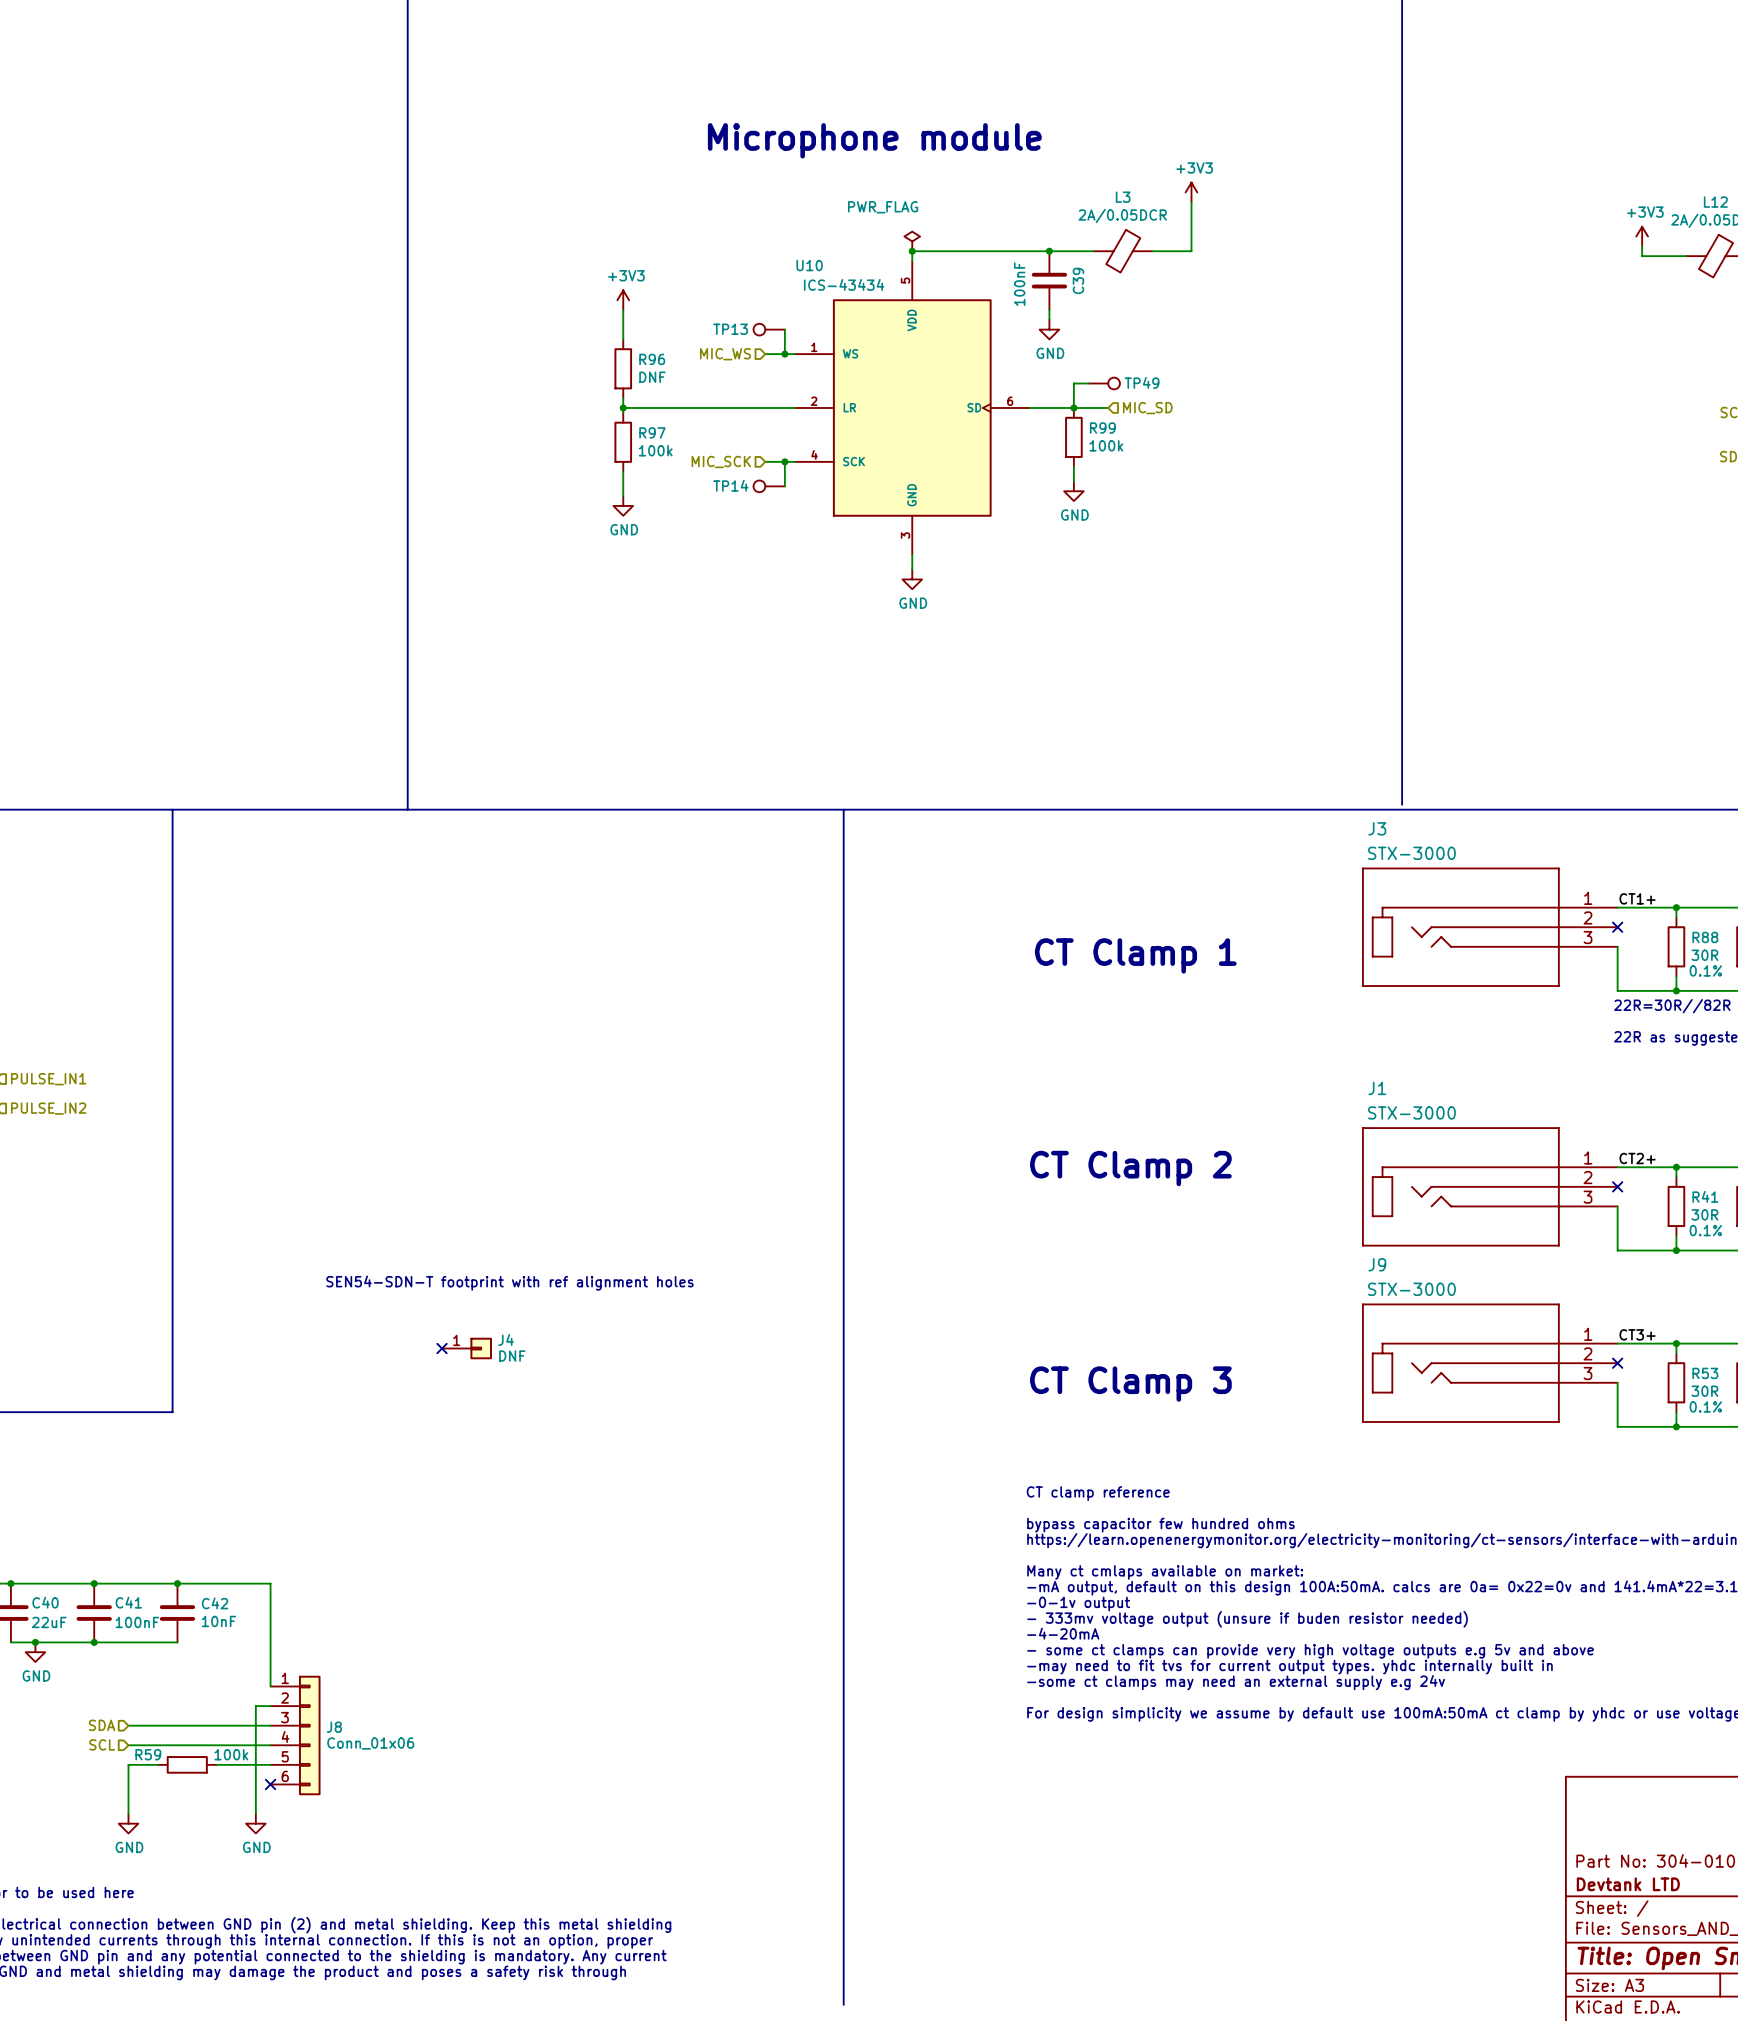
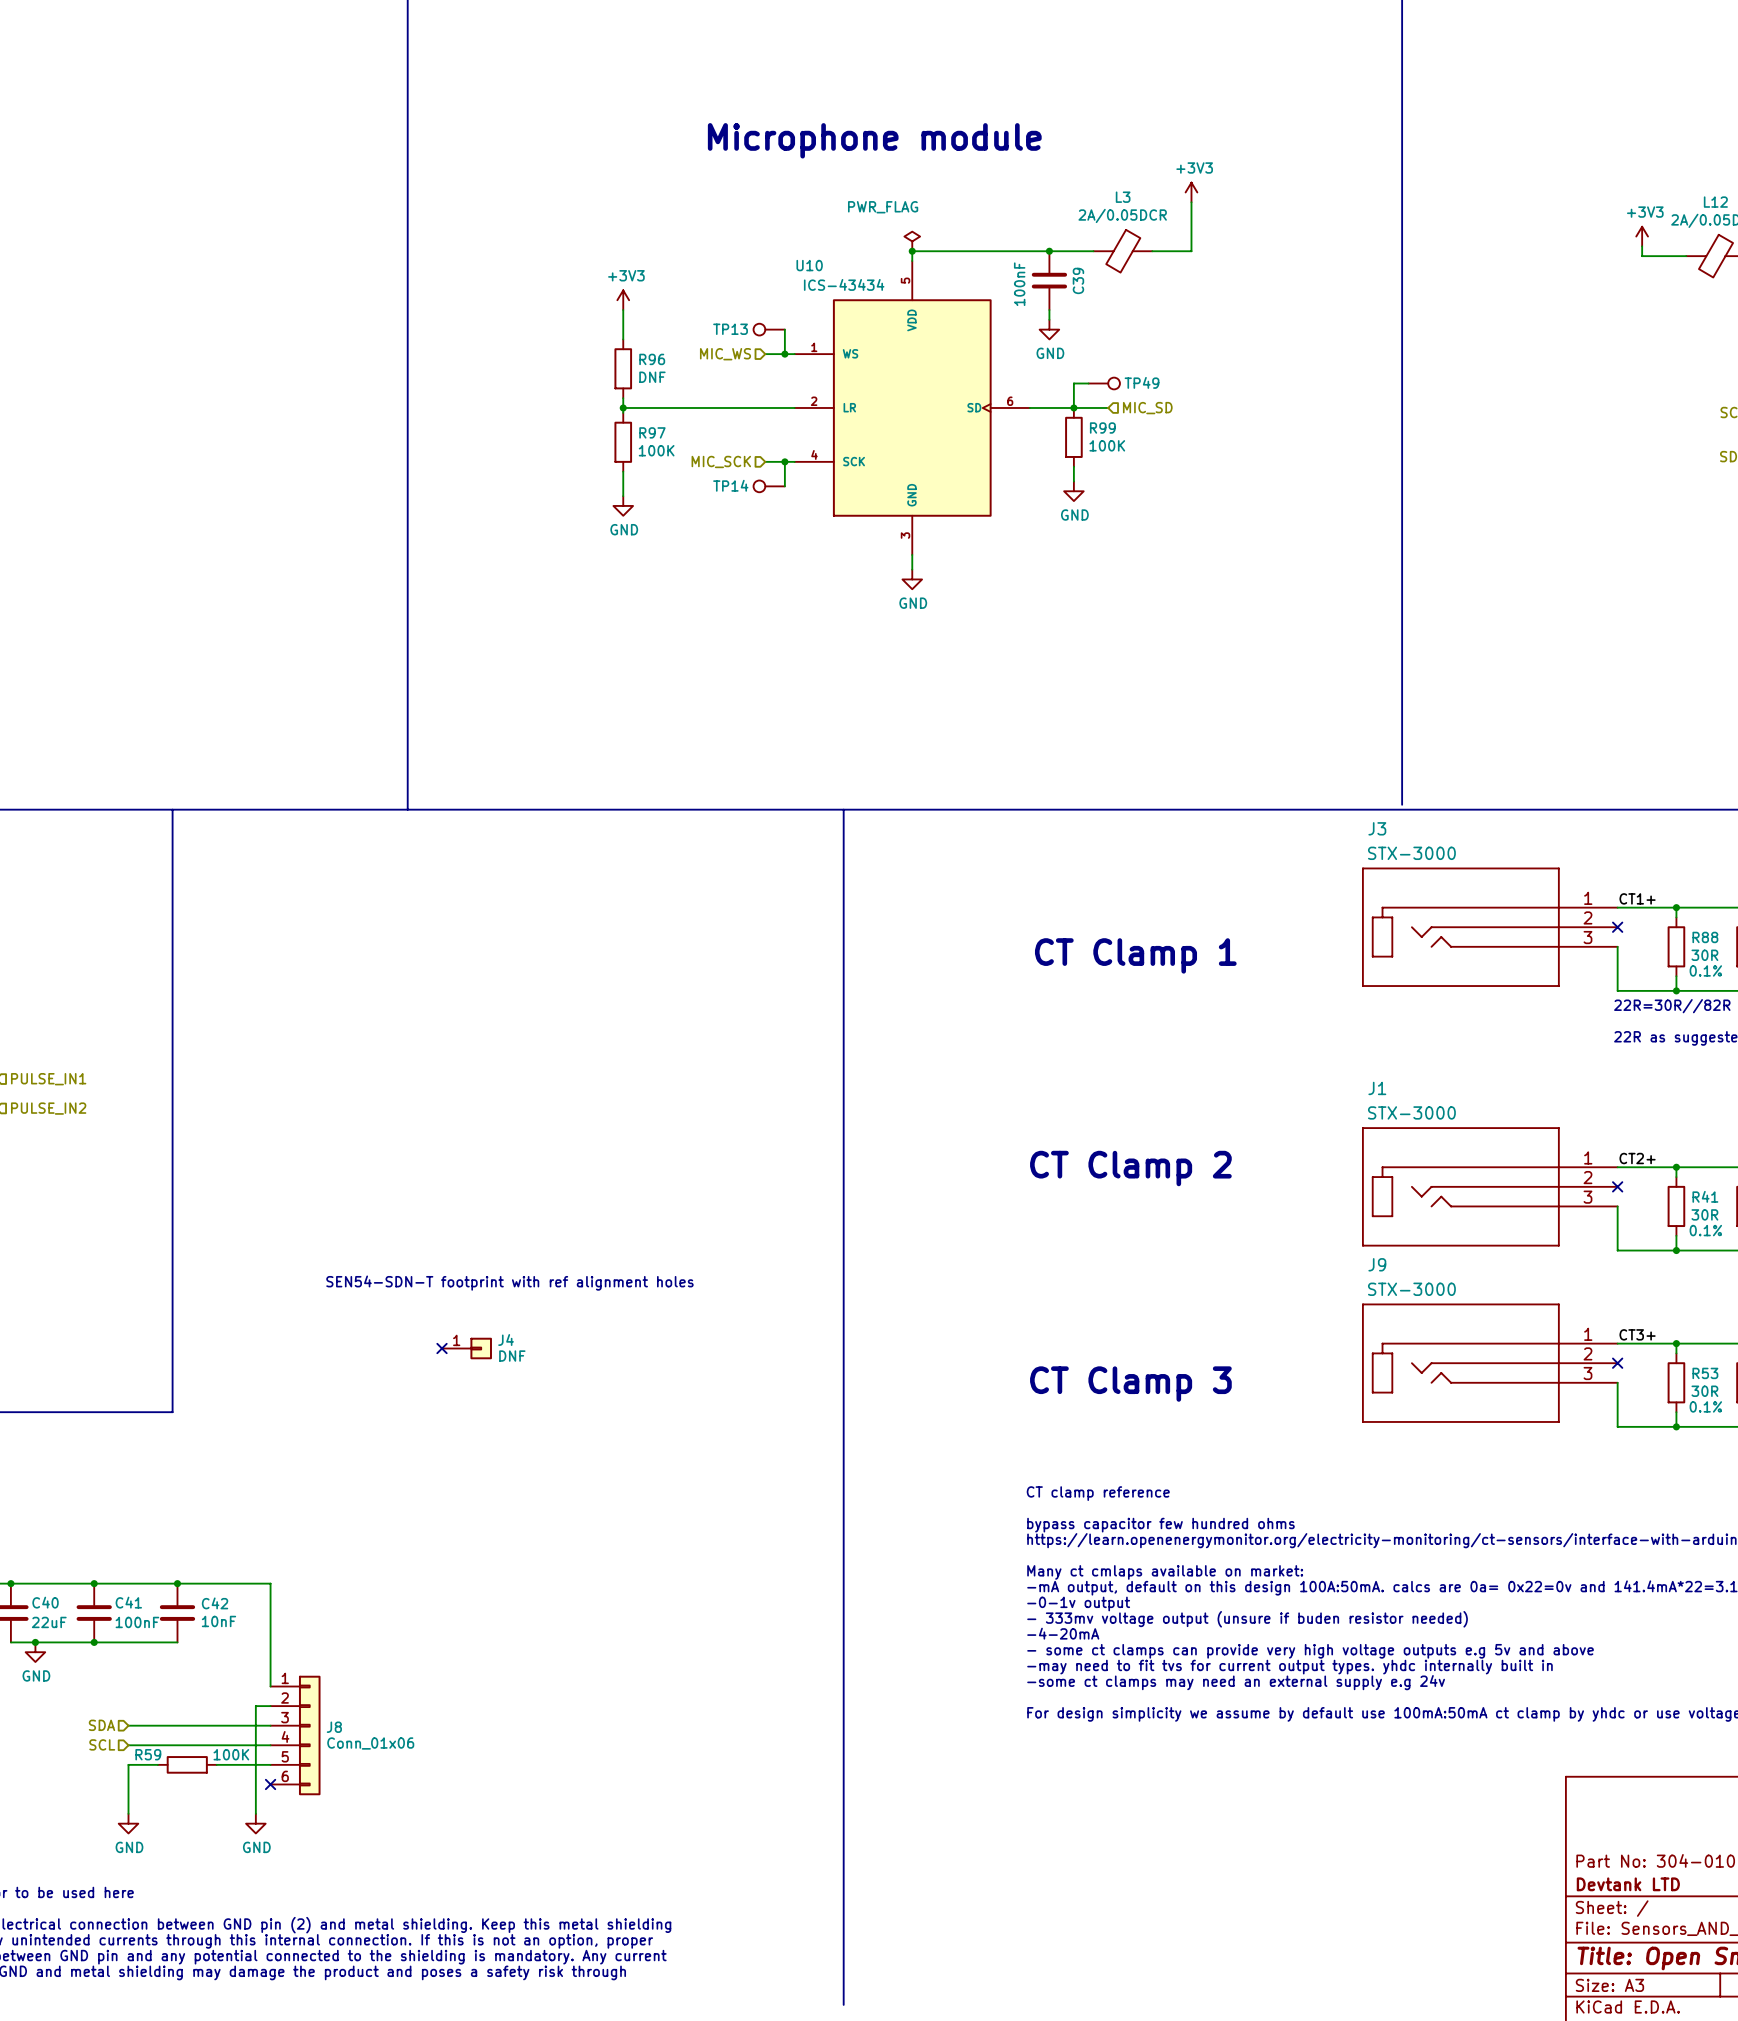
R99 value: 100k (1106, 445) -> 100K (1107, 445)
R97 value: 100k (655, 450) -> 100K (656, 450)
R59 value: 100k (231, 1754) -> 100K (231, 1754)

